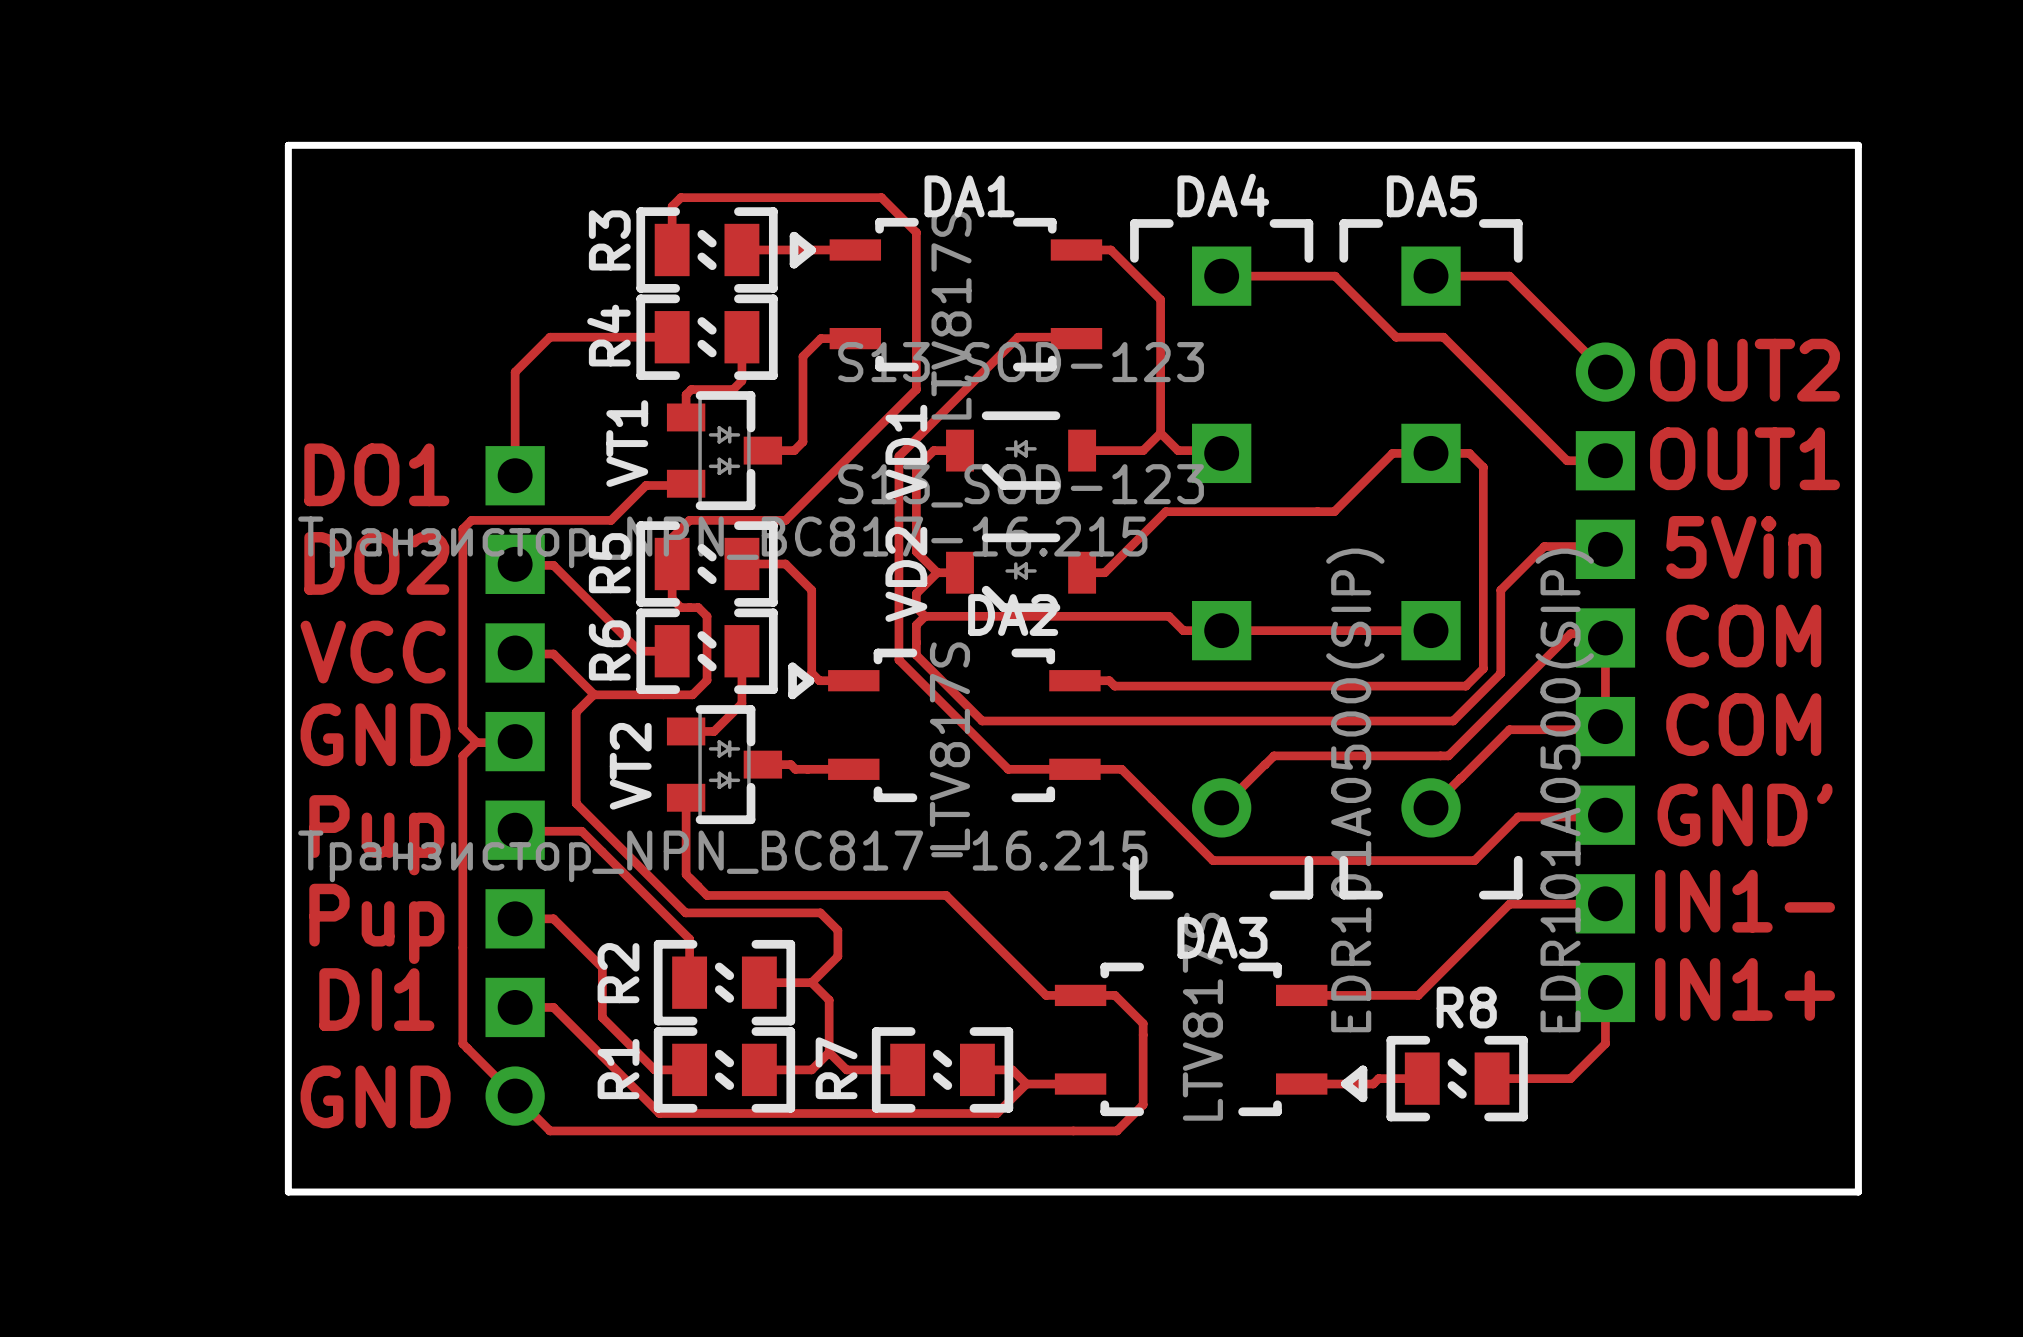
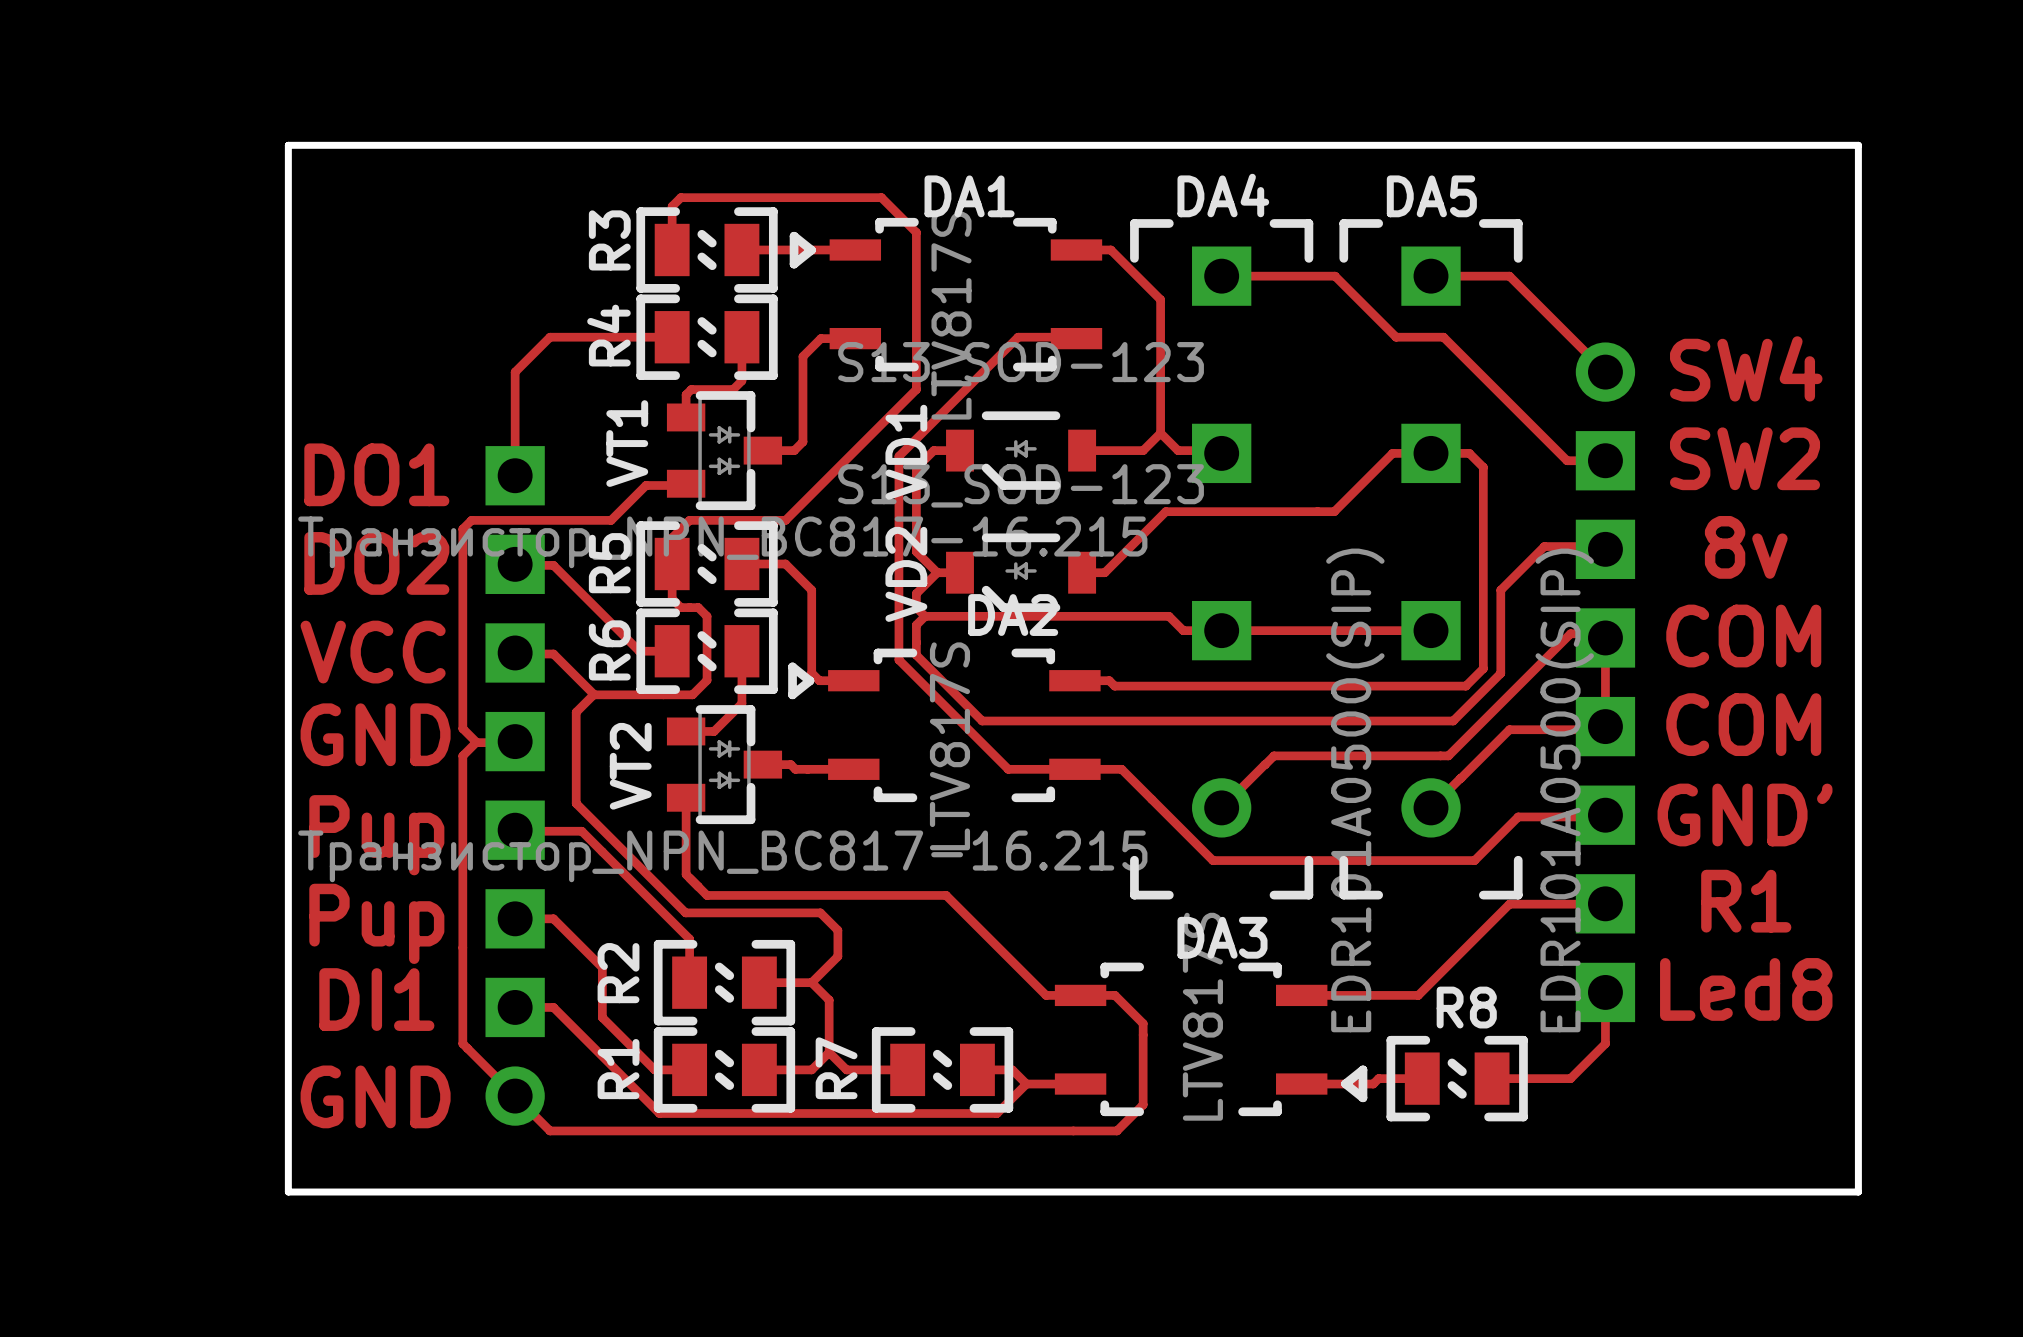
text: OUT2 (1745, 370) -> SW4 (1746, 368)
text: OUT1 (1745, 458) -> SW2 (1745, 458)
text: 5Vin (1743, 547) -> 8v (1746, 547)
text: IN1- (1745, 901) -> R1 (1746, 901)
text: IN1+ (1745, 989) -> Led8 (1746, 989)

